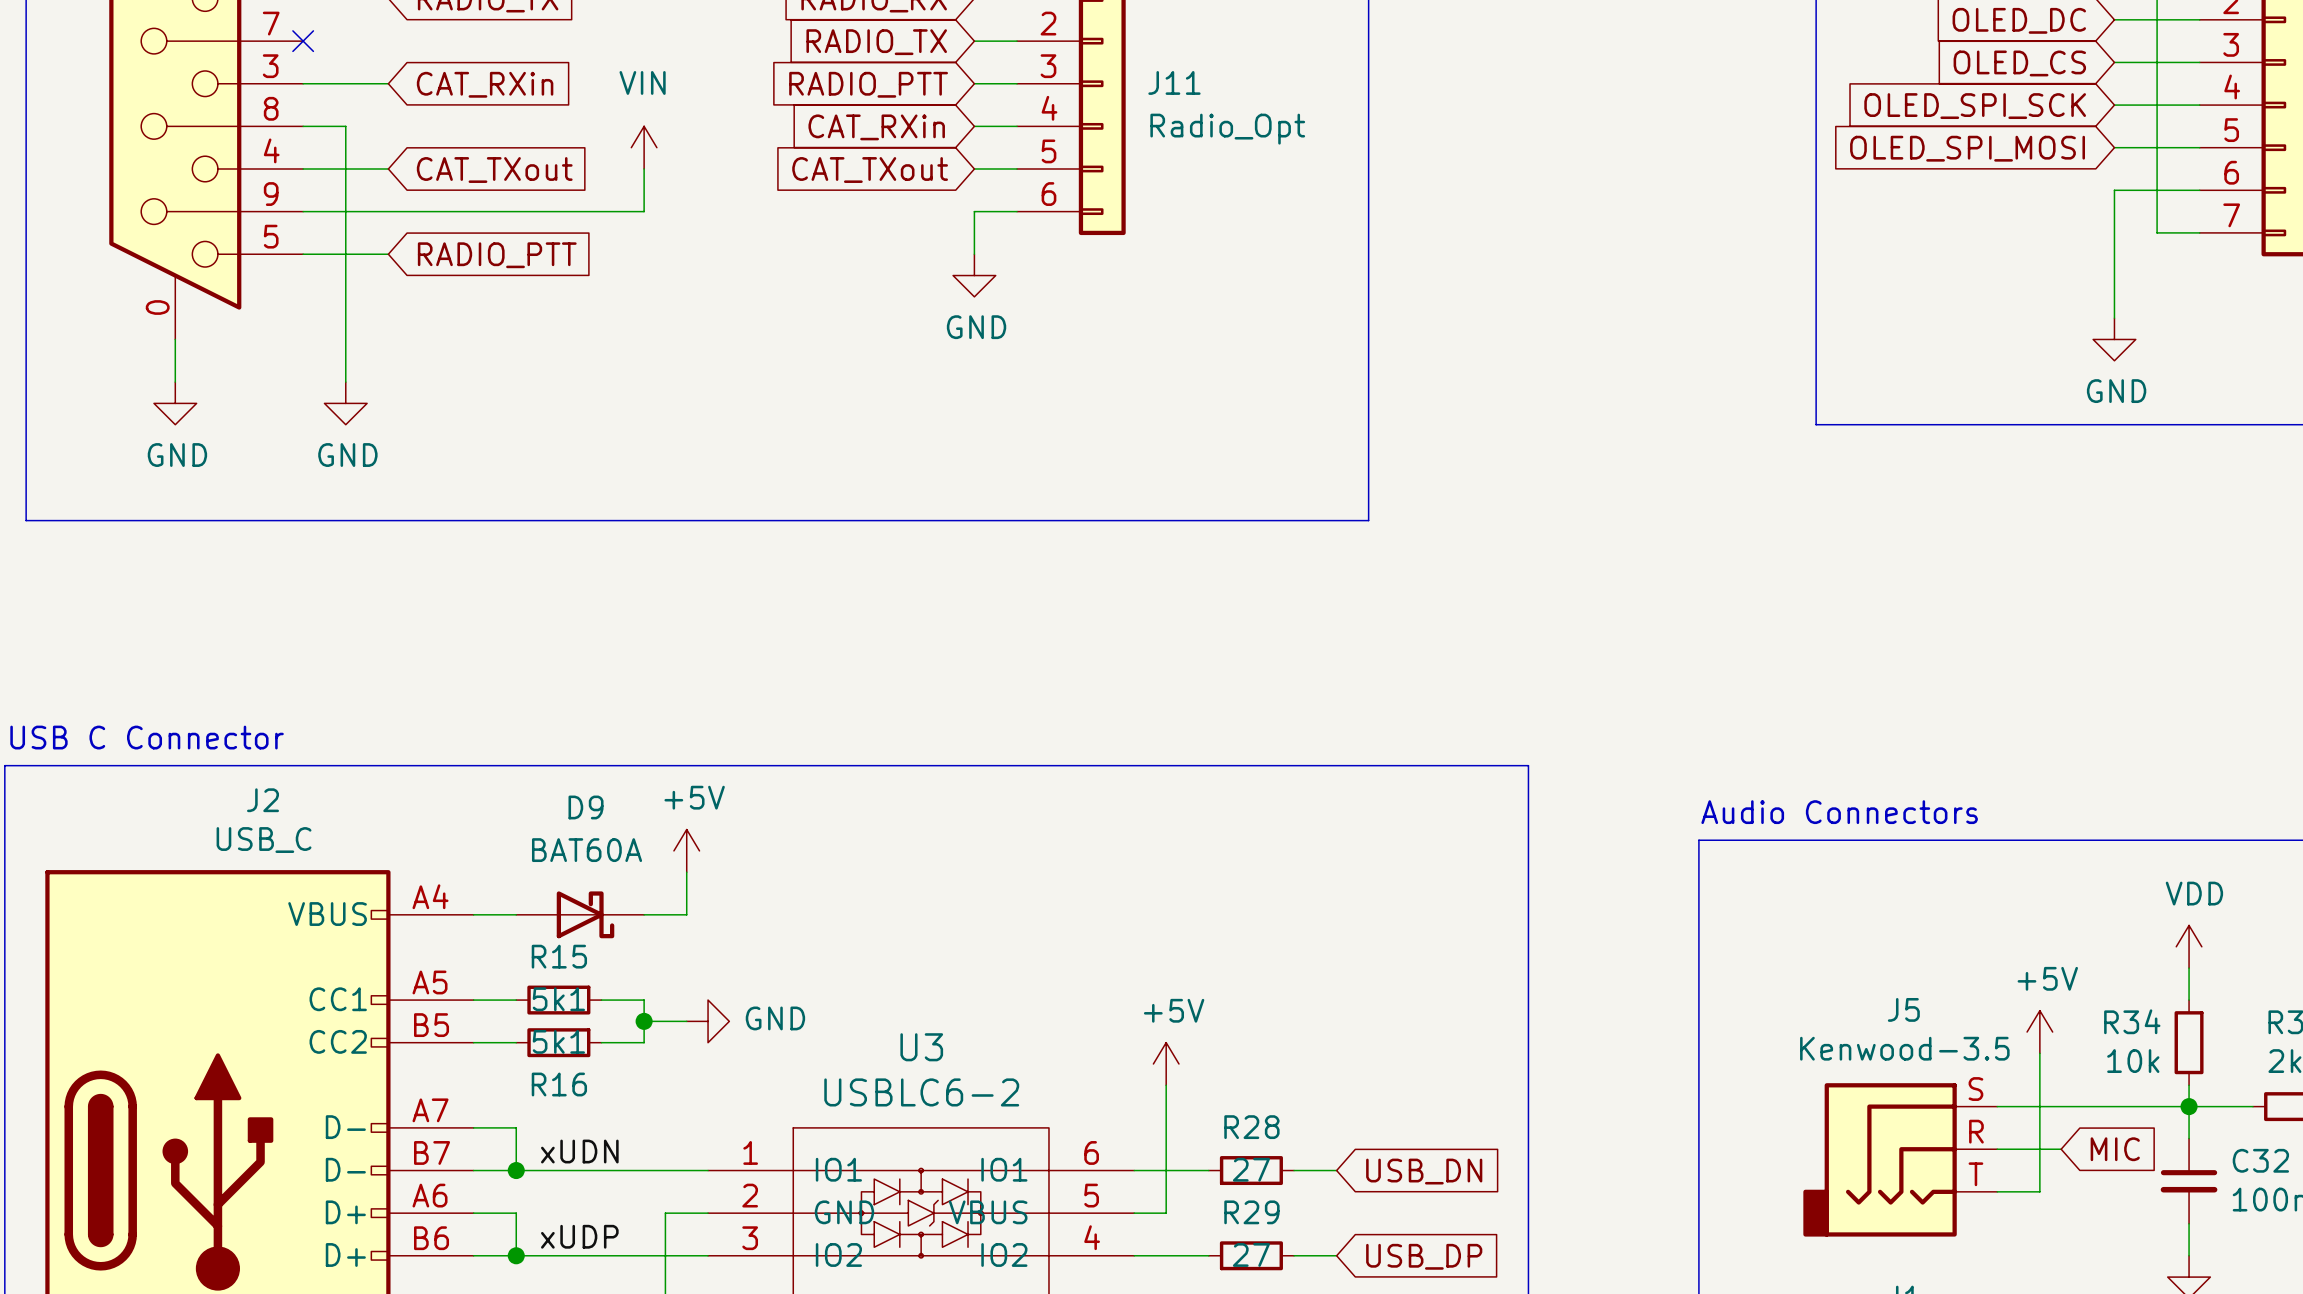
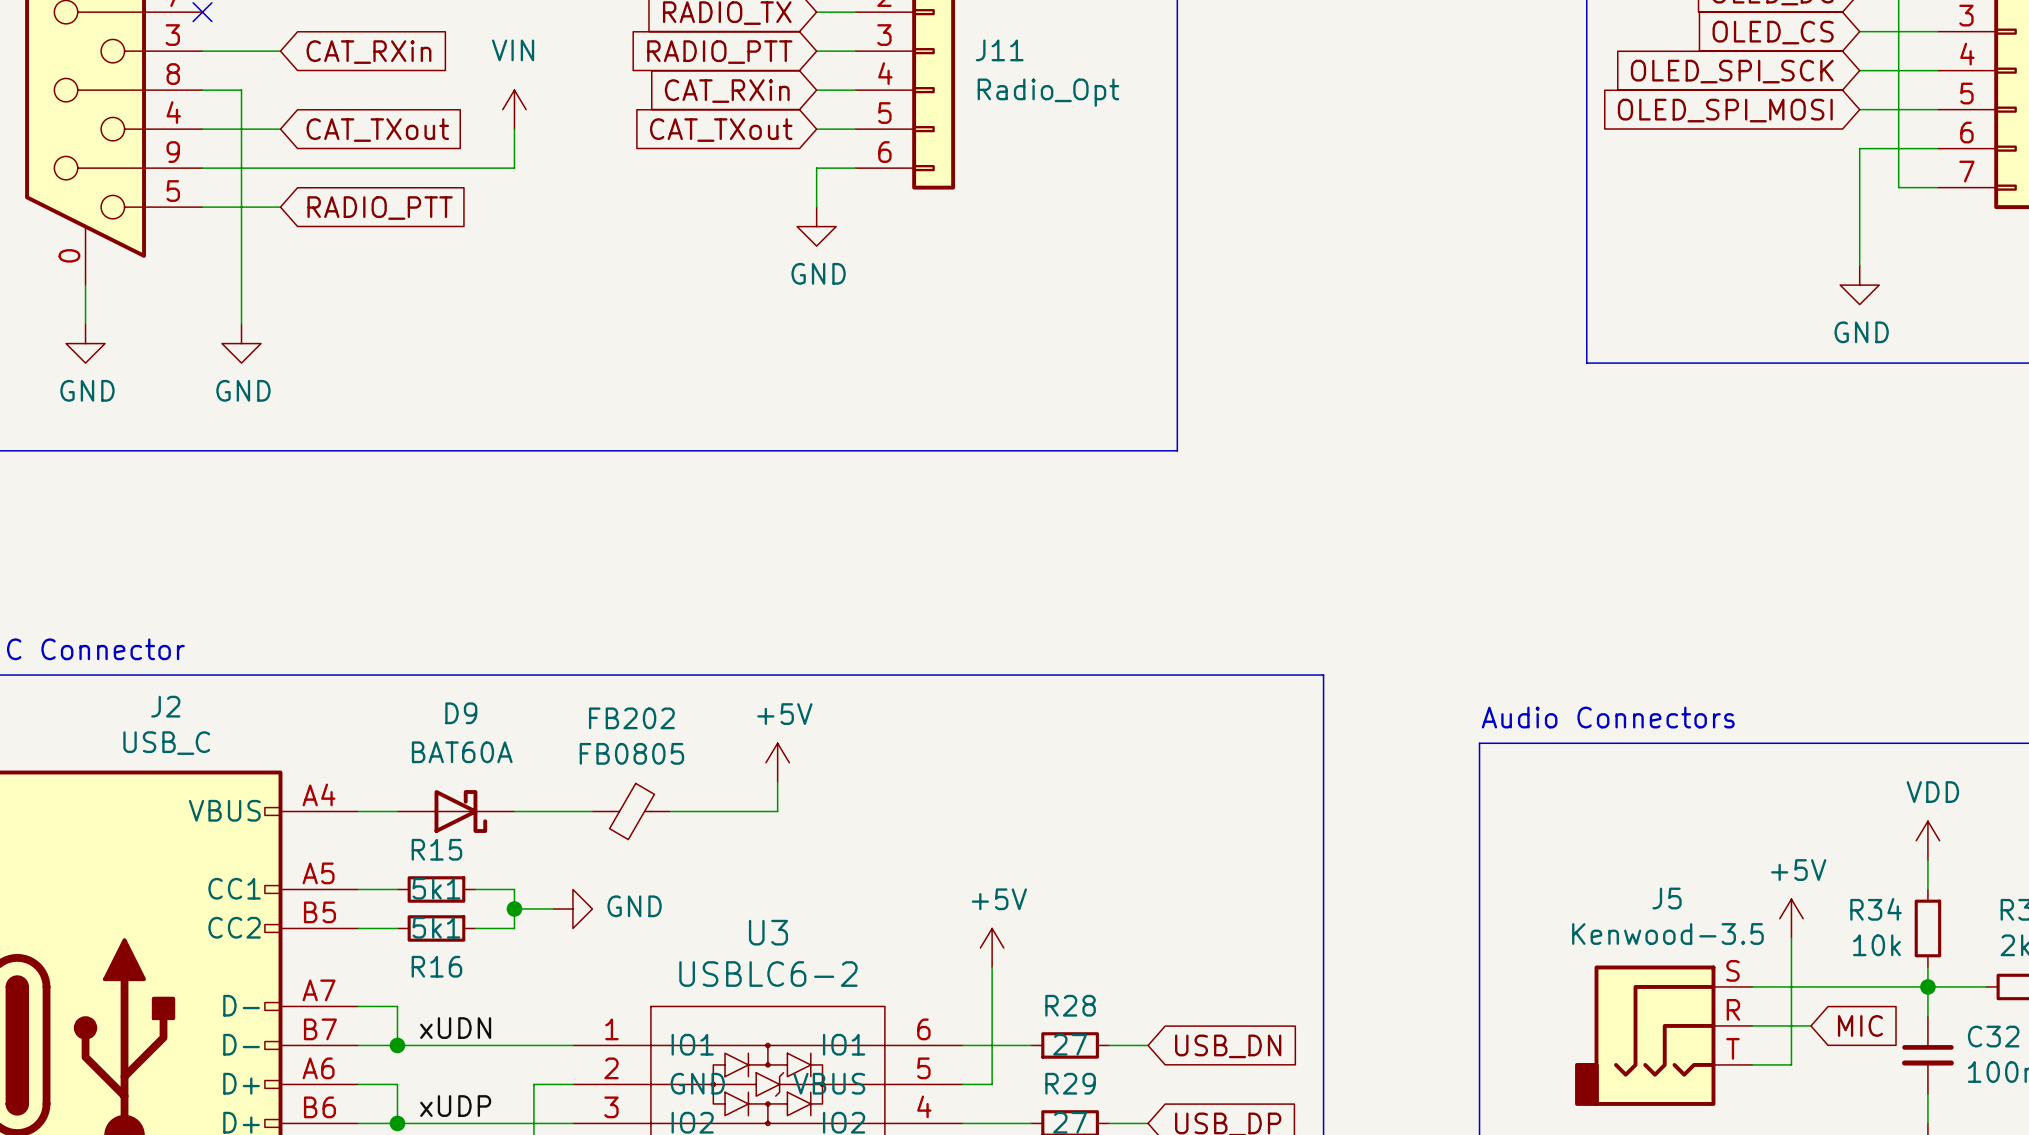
power symbol position: +5V (686, 850) -> +5V (777, 762)
wire: (686, 872) (686, 914) -> (592, 811) (553, 811)
wire: none -> (777, 782) (777, 811) (670, 811)
FB202: none -> FB0805 (631, 811)

